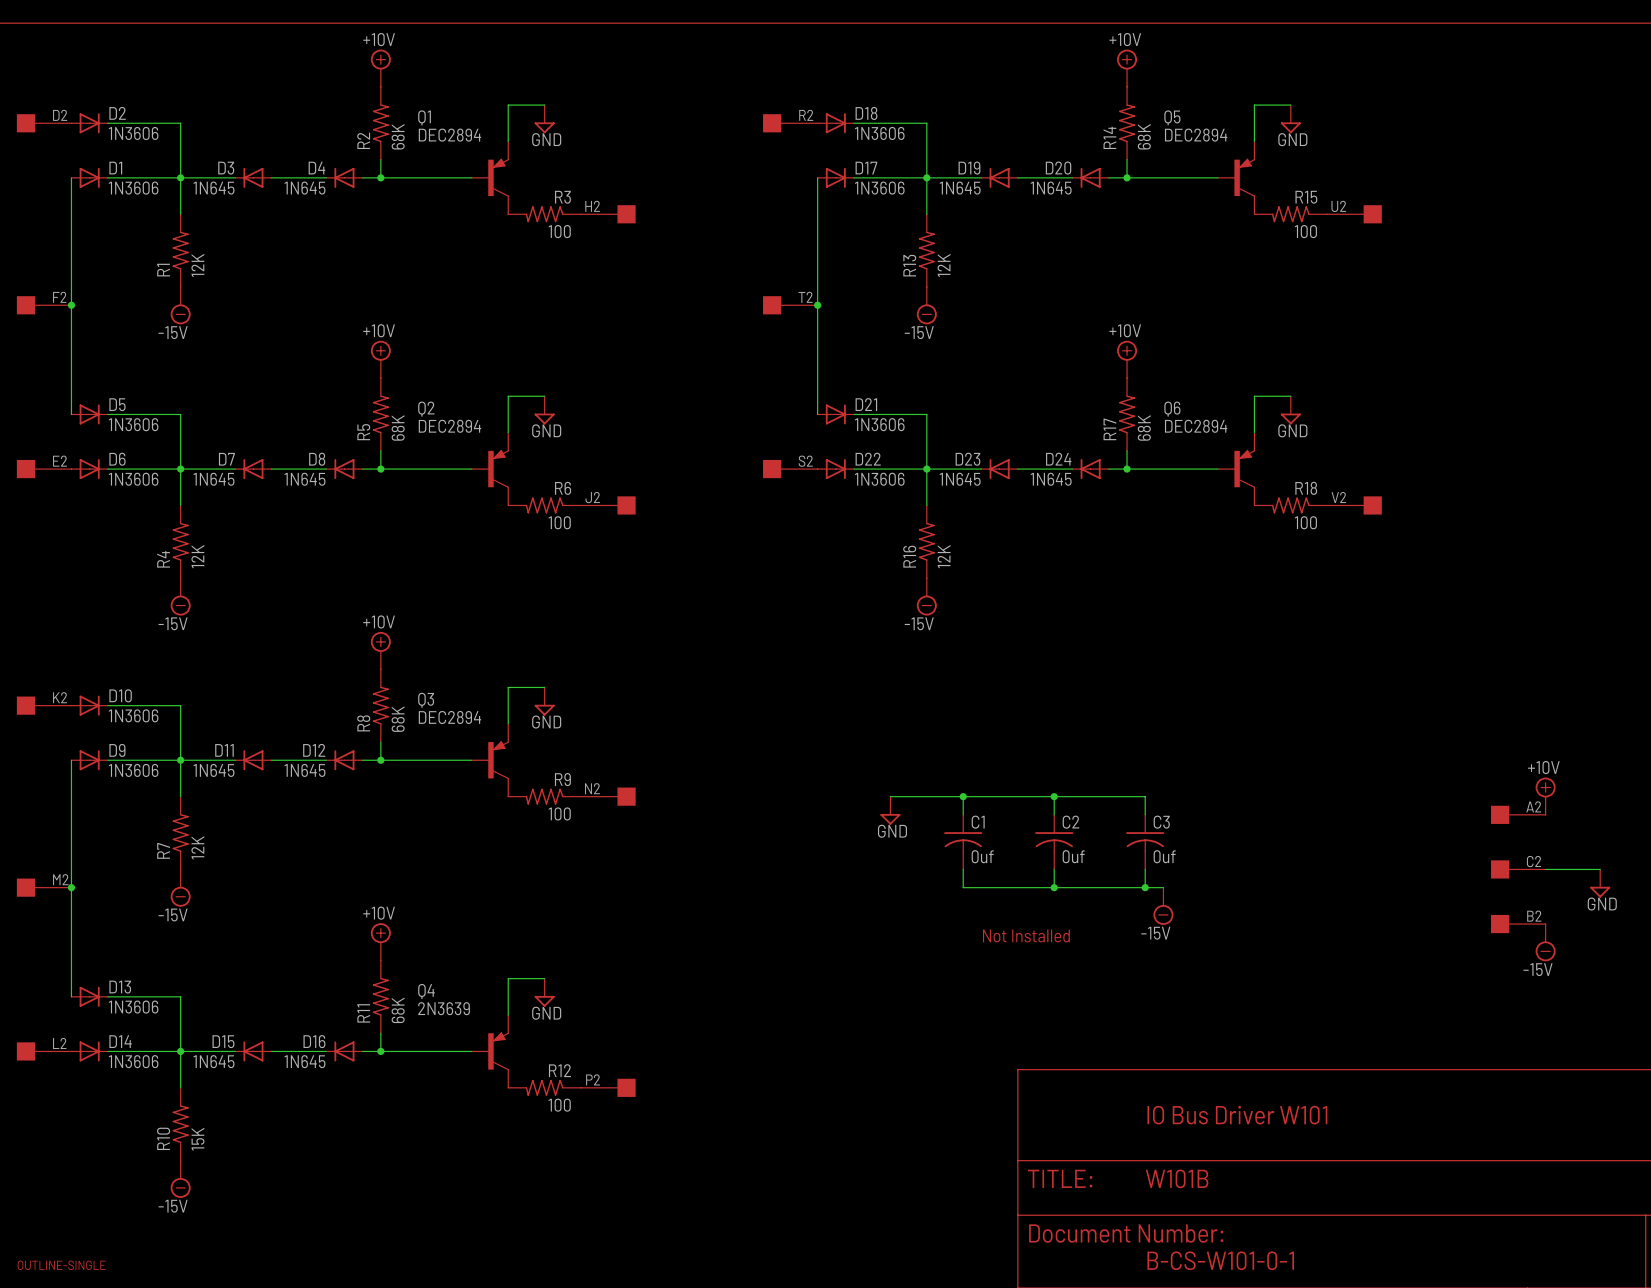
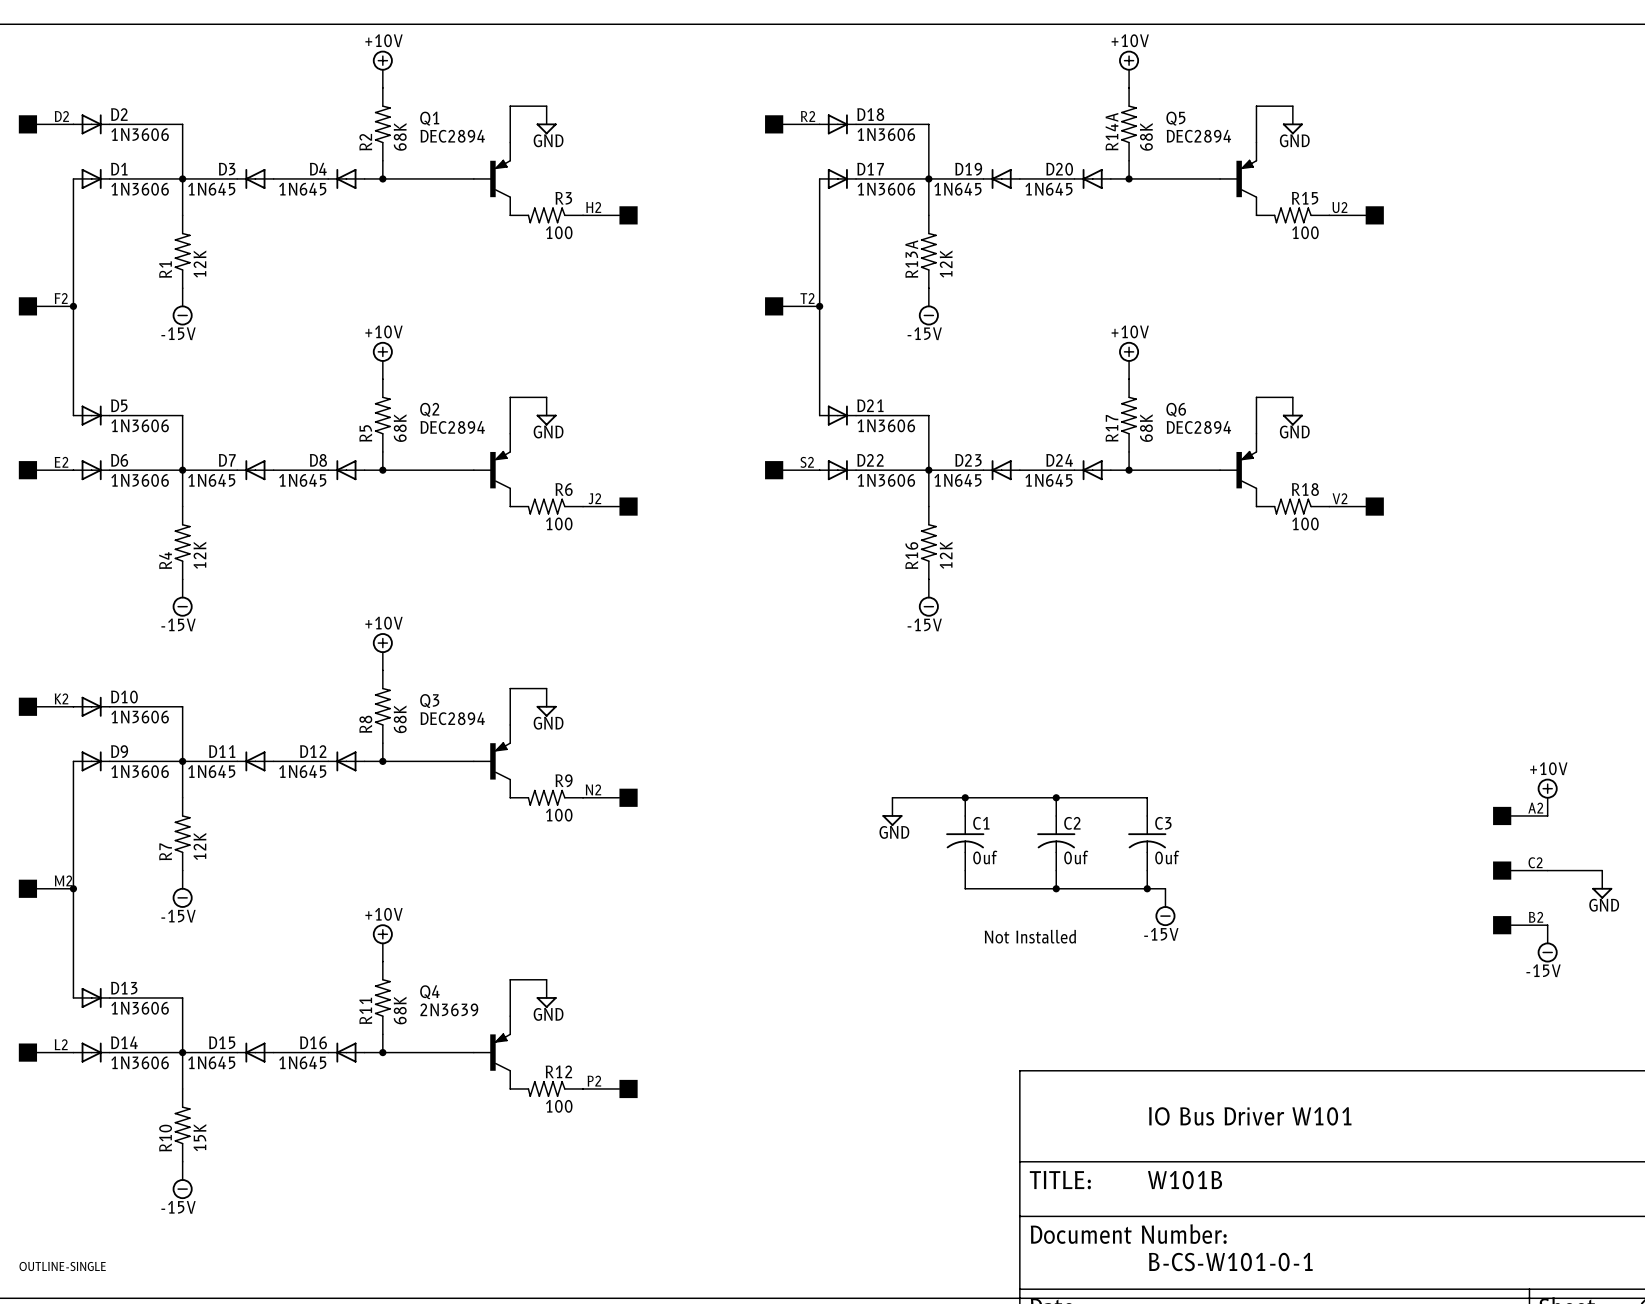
R14 name: R14 (1109, 137) -> R14A (1111, 131)
R13 name: R13 (909, 265) -> R13A (911, 259)

